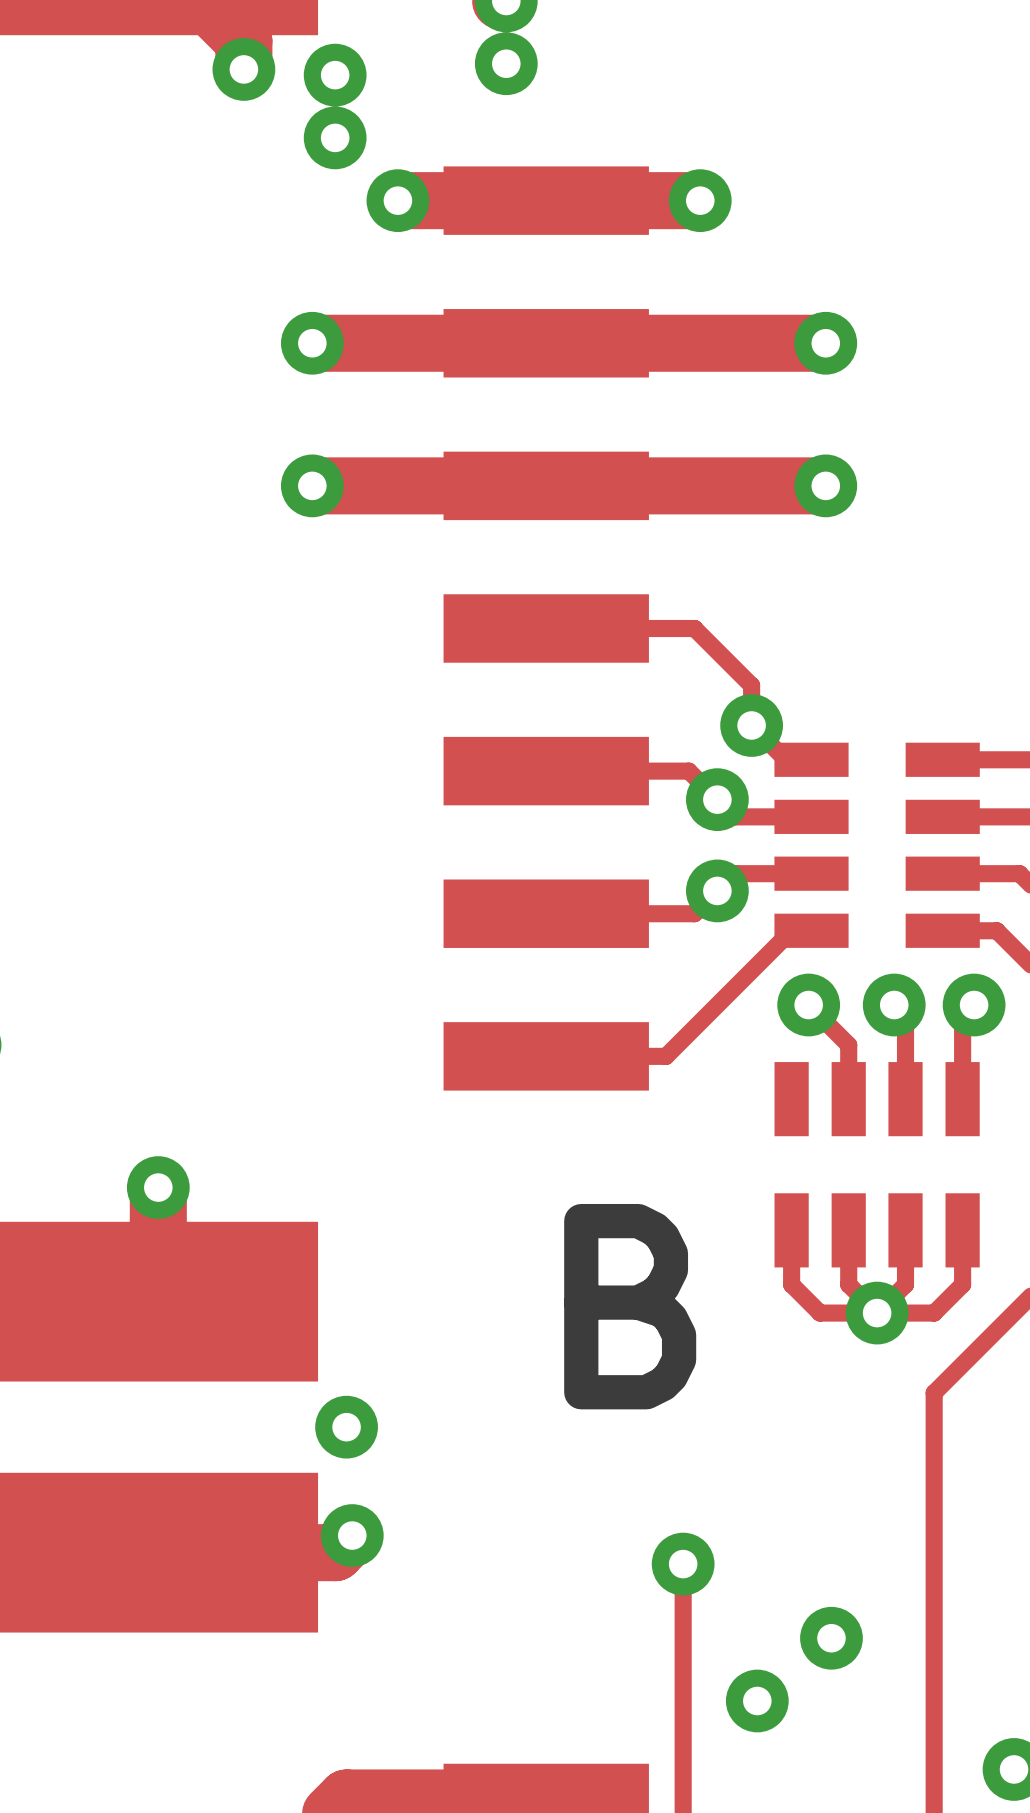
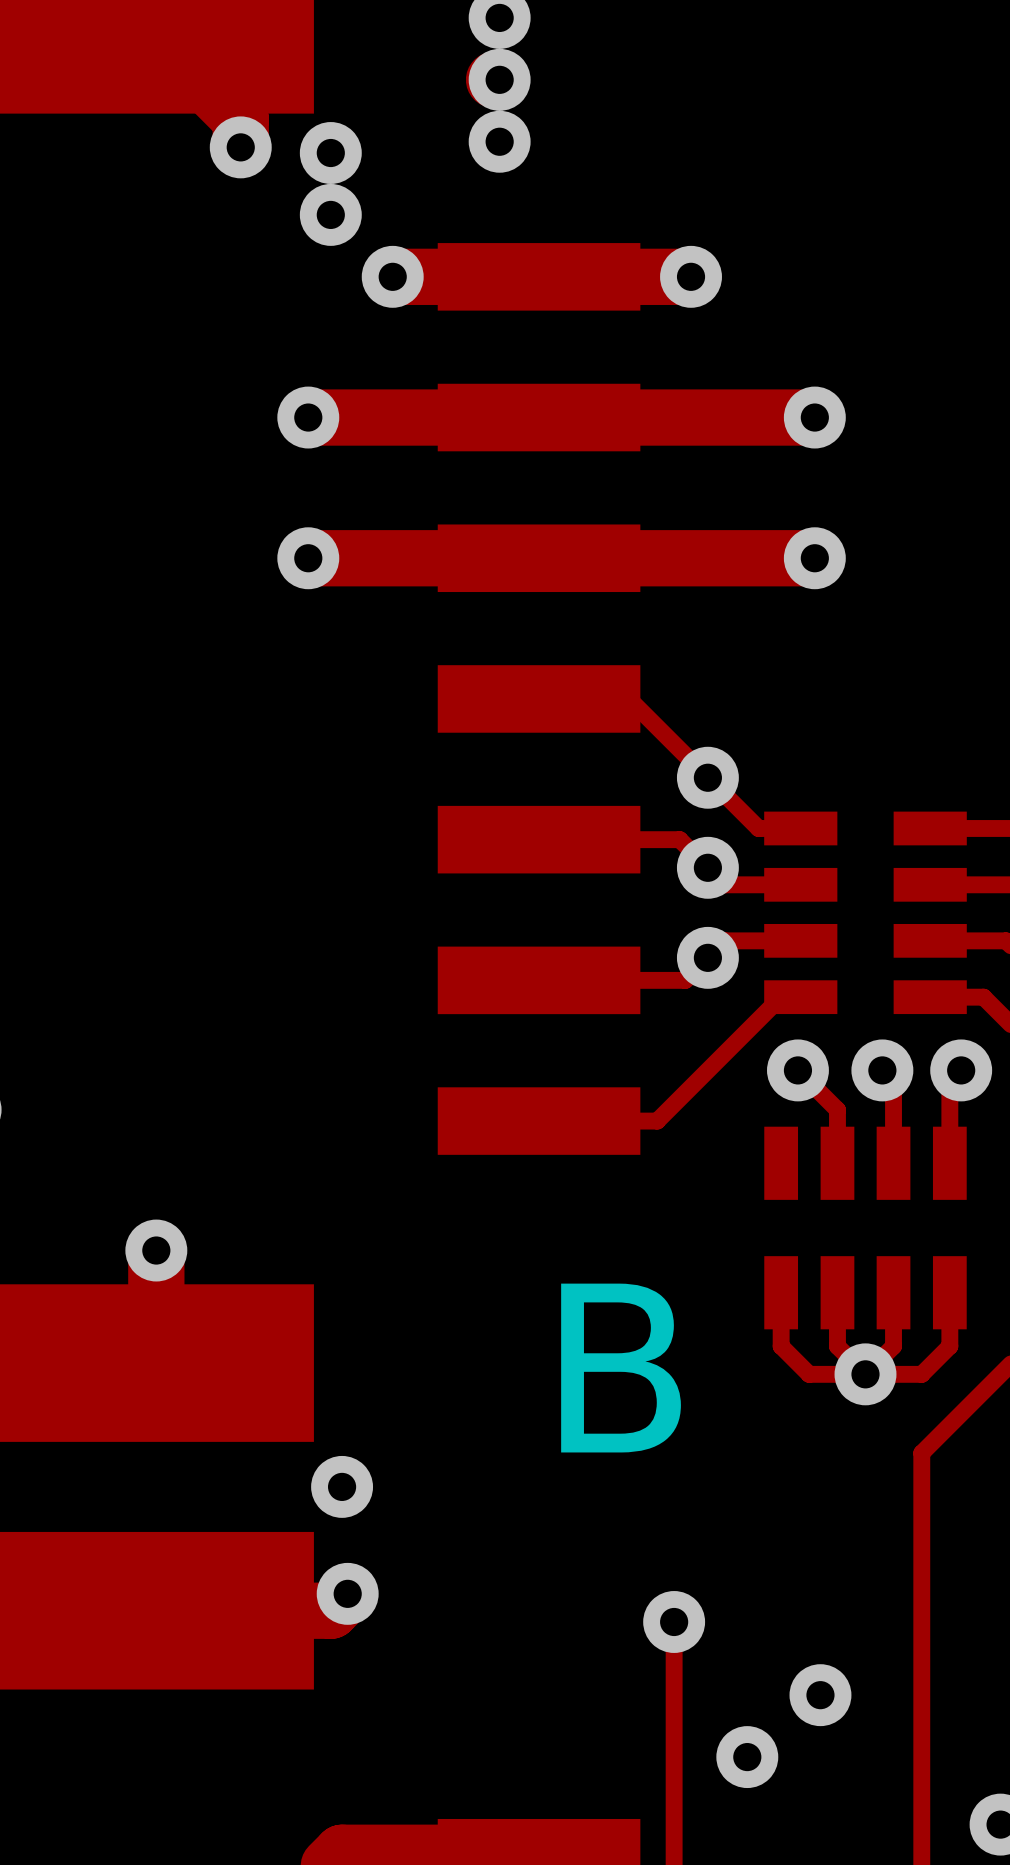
track: (637, 628) (694, 628) (751, 685) (751, 725) (785, 759) -> (629, 698) (758, 828) (775, 828)
via position: (751, 725) -> (707, 777)

